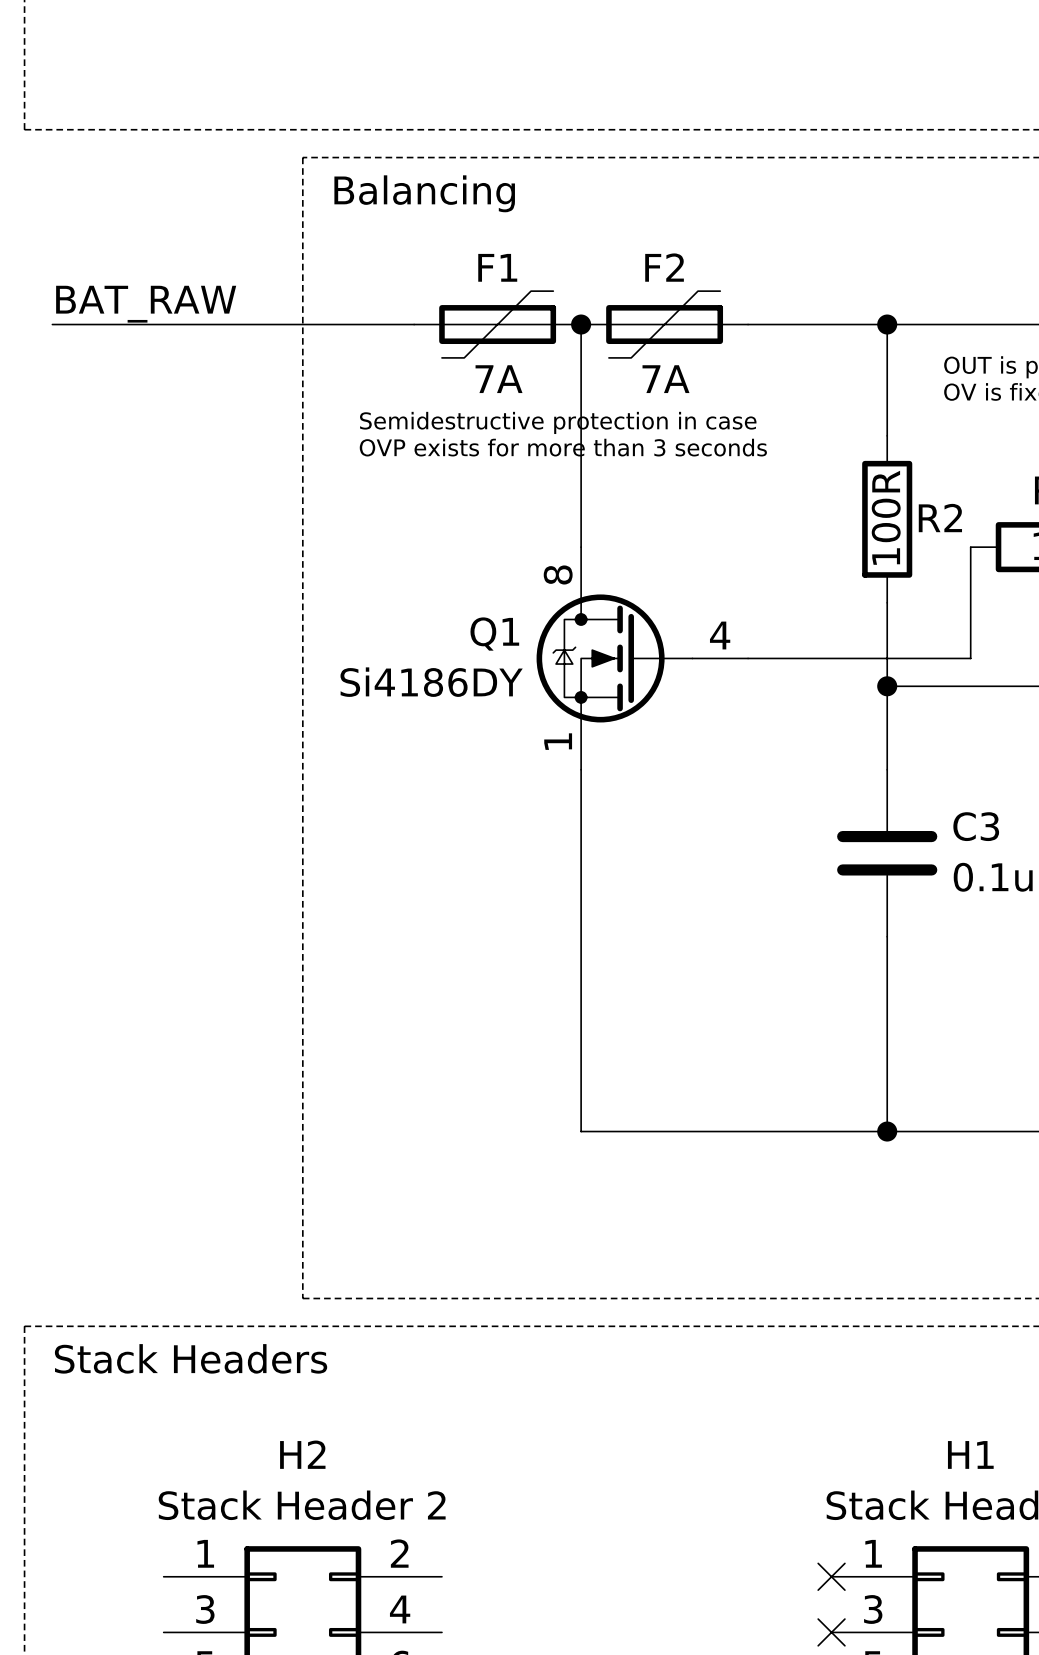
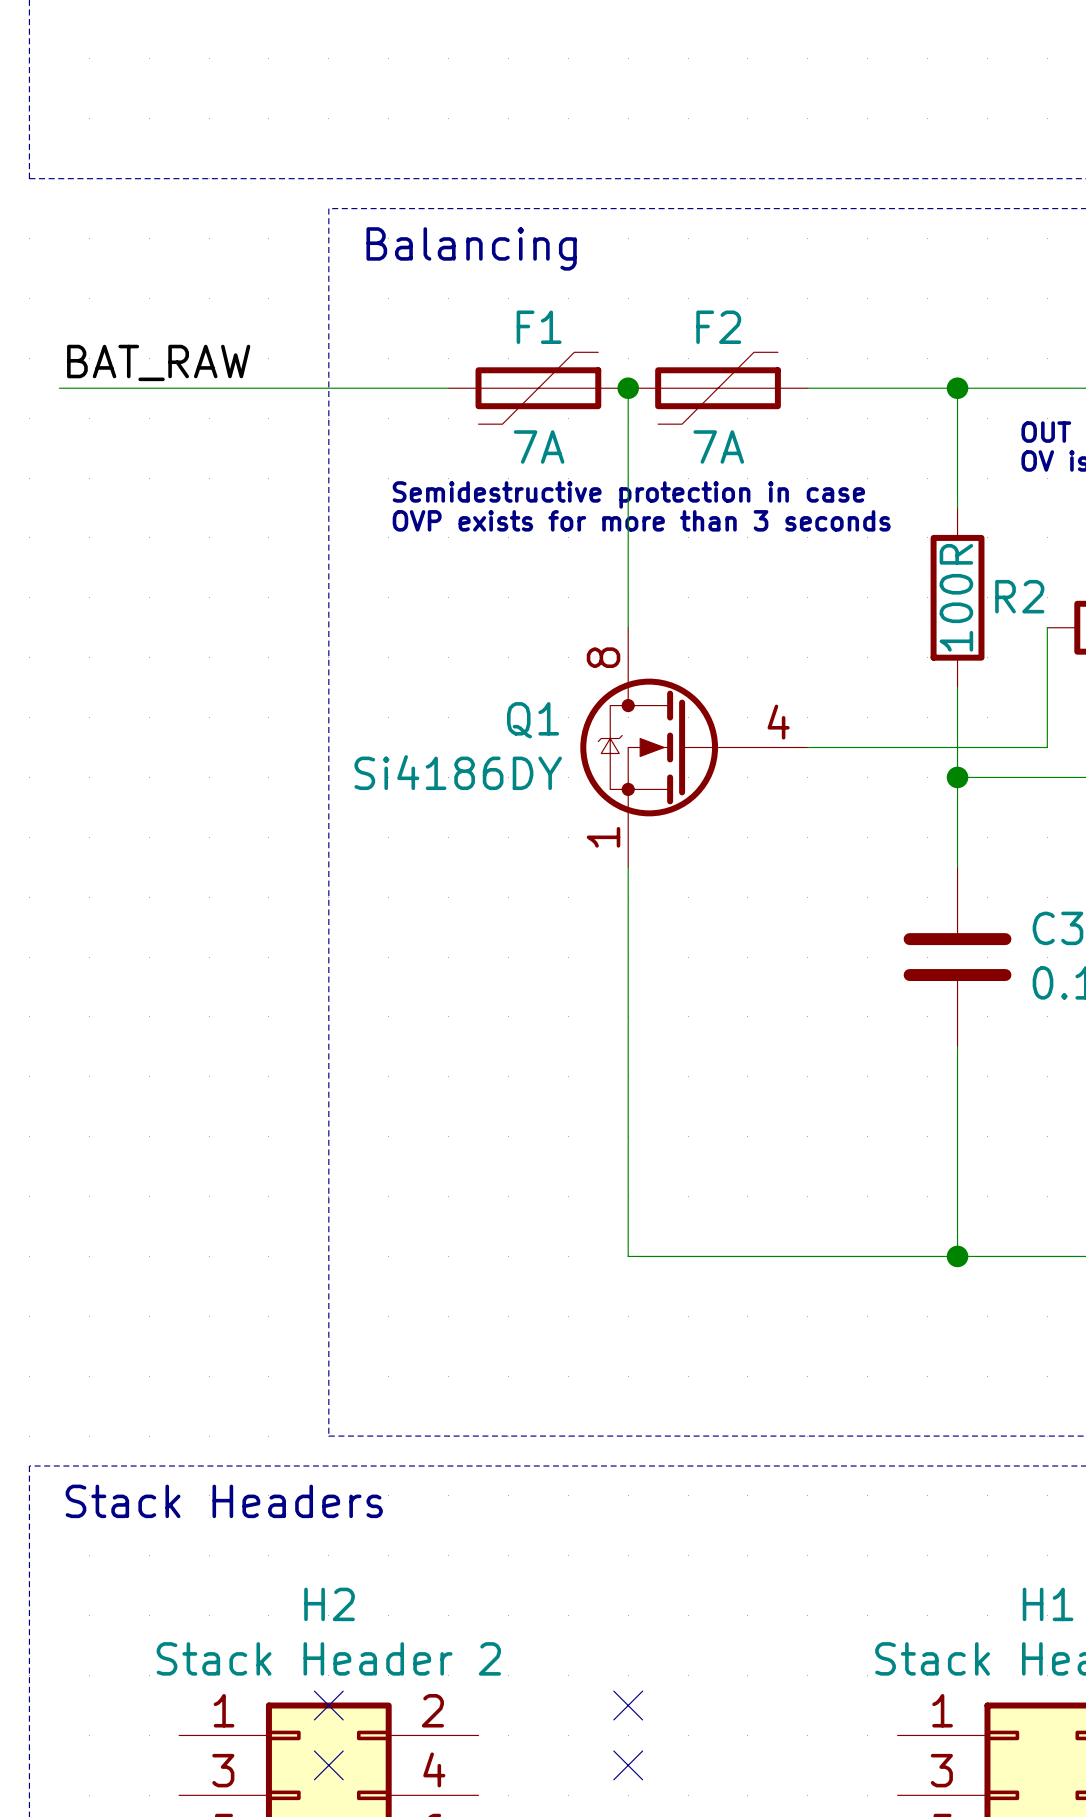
no-connect mark: none -> (328, 1705)
no-connect mark: none -> (628, 1705)
no-connect mark: (831, 1576) -> none
no-connect mark: none -> (328, 1765)
no-connect mark: none -> (628, 1765)
no-connect mark: (831, 1632) -> none

